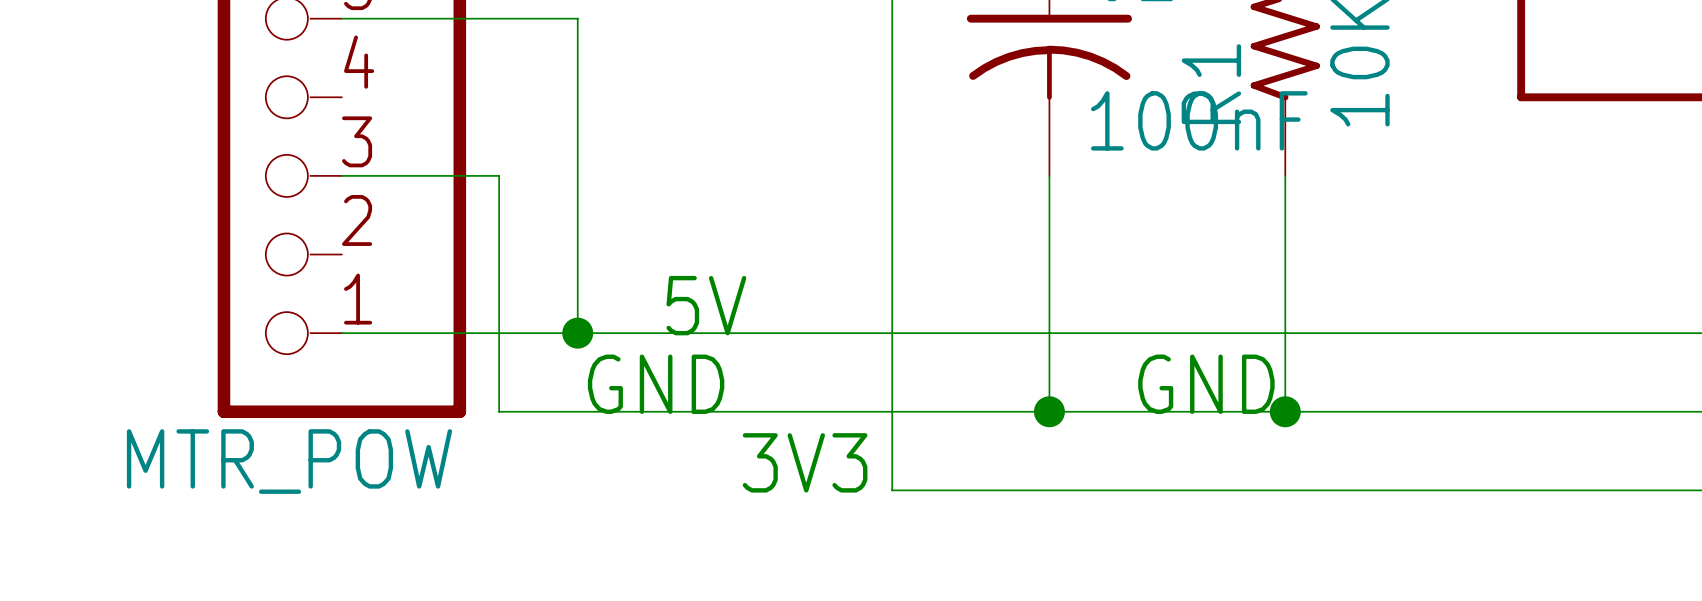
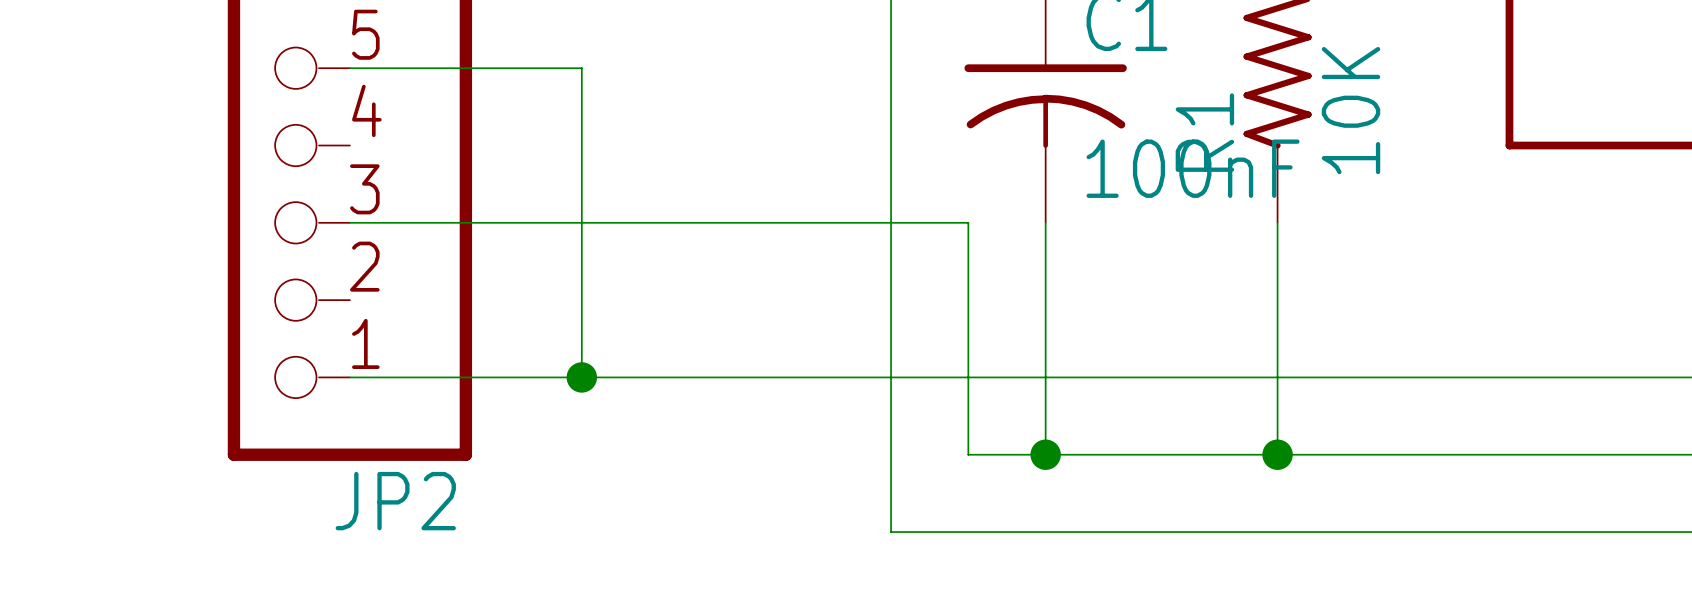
wire: (499, 175) (499, 411) (970, 411) -> (504, 222) (968, 222) (968, 454)
text: 5V (706, 305) -> none
text: GND (656, 384) -> none
text: GND (1206, 384) -> none
MTR_POW name: MTR_POW (289, 461) -> JP2 (395, 501)
text: 3V3 (805, 462) -> none

